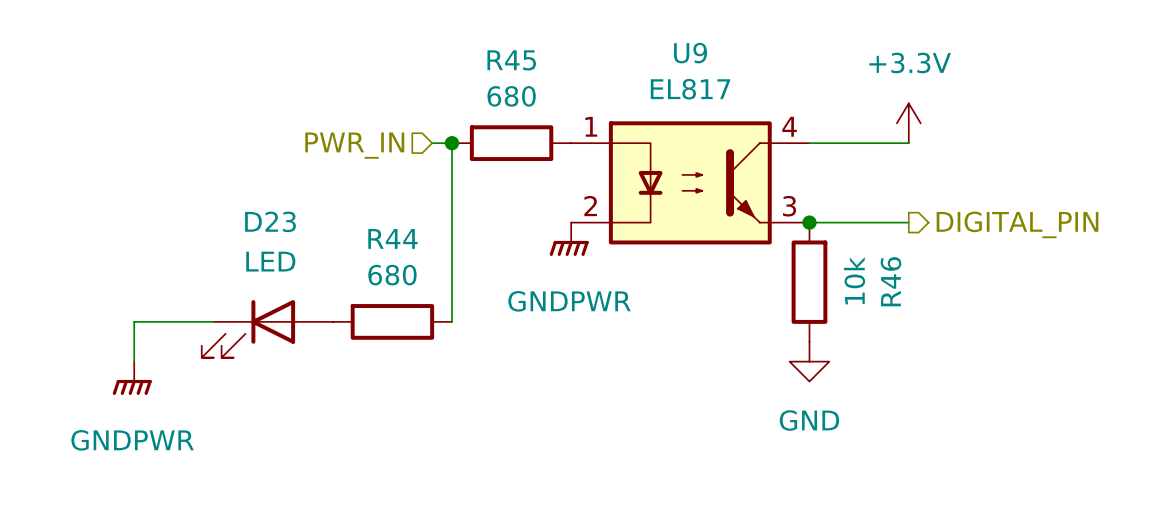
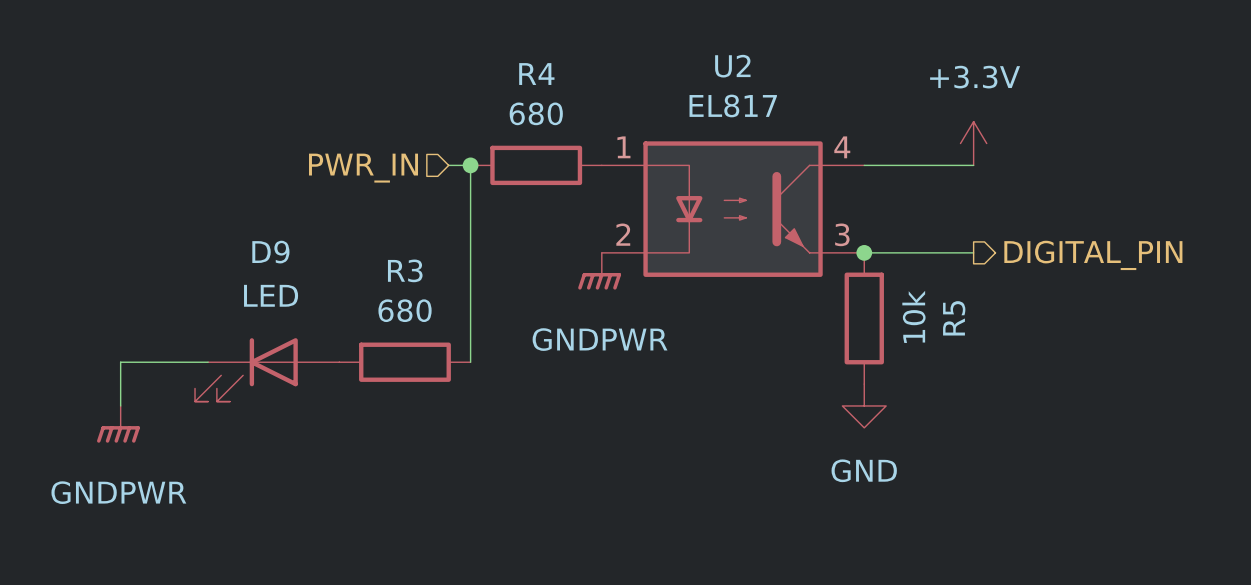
U9 name: U9 (690, 53) -> U2 (732, 66)
R45 name: R45 (511, 60) -> R4 (536, 74)
D23 name: D23 (270, 221) -> D9 (270, 252)
R44 name: R44 (392, 238) -> R3 (405, 270)
R46 name: R46 (890, 281) -> R5 (954, 318)

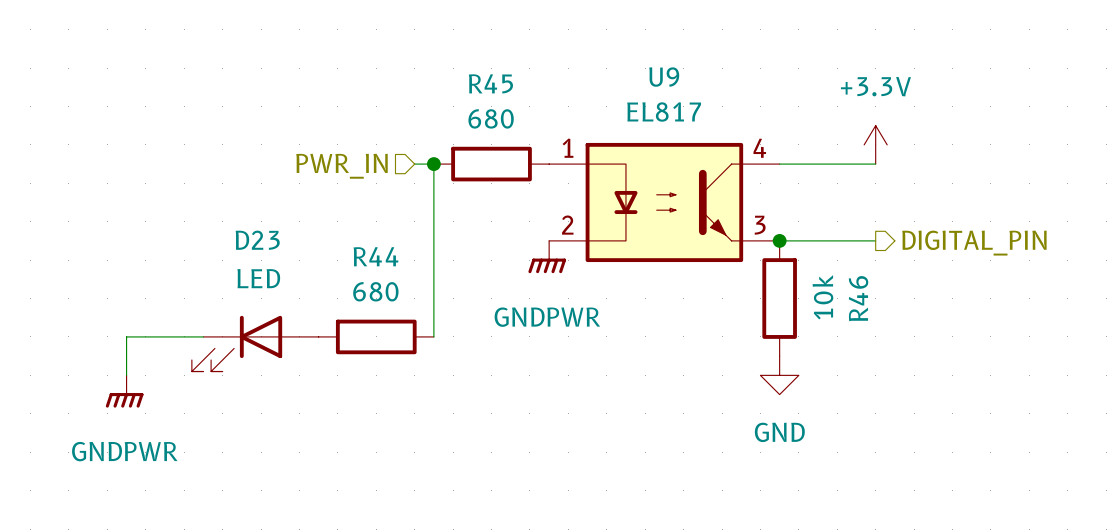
U2 name: U2 (732, 66) -> U9 (664, 77)
R4 name: R4 (536, 74) -> R45 (490, 83)
D9 name: D9 (270, 252) -> D23 (257, 240)
R3 name: R3 (405, 270) -> R44 (375, 256)
R5 name: R5 (954, 318) -> R46 (858, 298)

